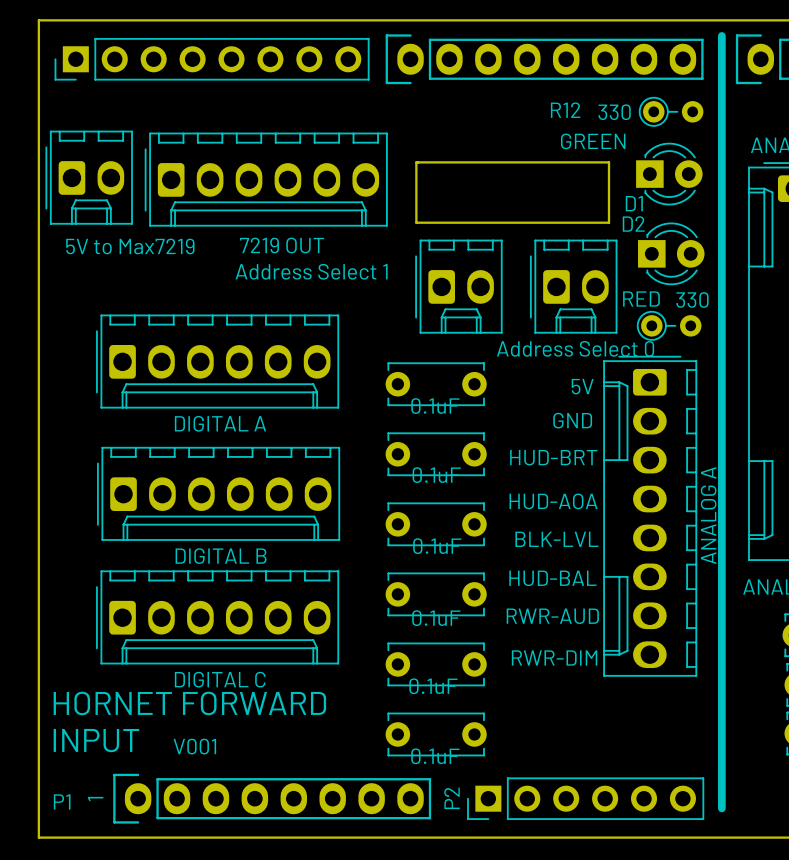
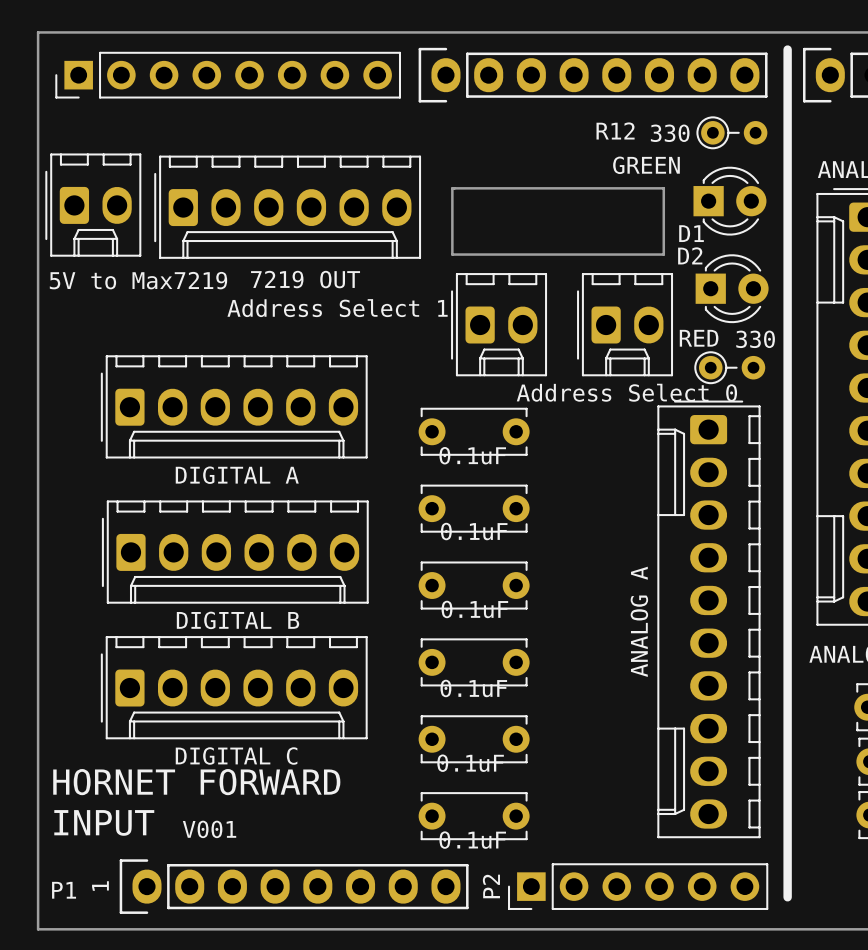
text: 5V (582, 386) -> none
text: GND (572, 420) -> none
text: HUD-BRT (553, 457) -> none
text: HUD-AOA (553, 501) -> none
part: ANALOG A (650, 516) -> none
text: BLK-LVL (556, 539) -> none
part: none -> ANALOG A (708, 619)
text: HUD-BAL (552, 578) -> none
text: RWR-AUD (552, 616) -> none
text: RWR-DIM (554, 658) -> none

